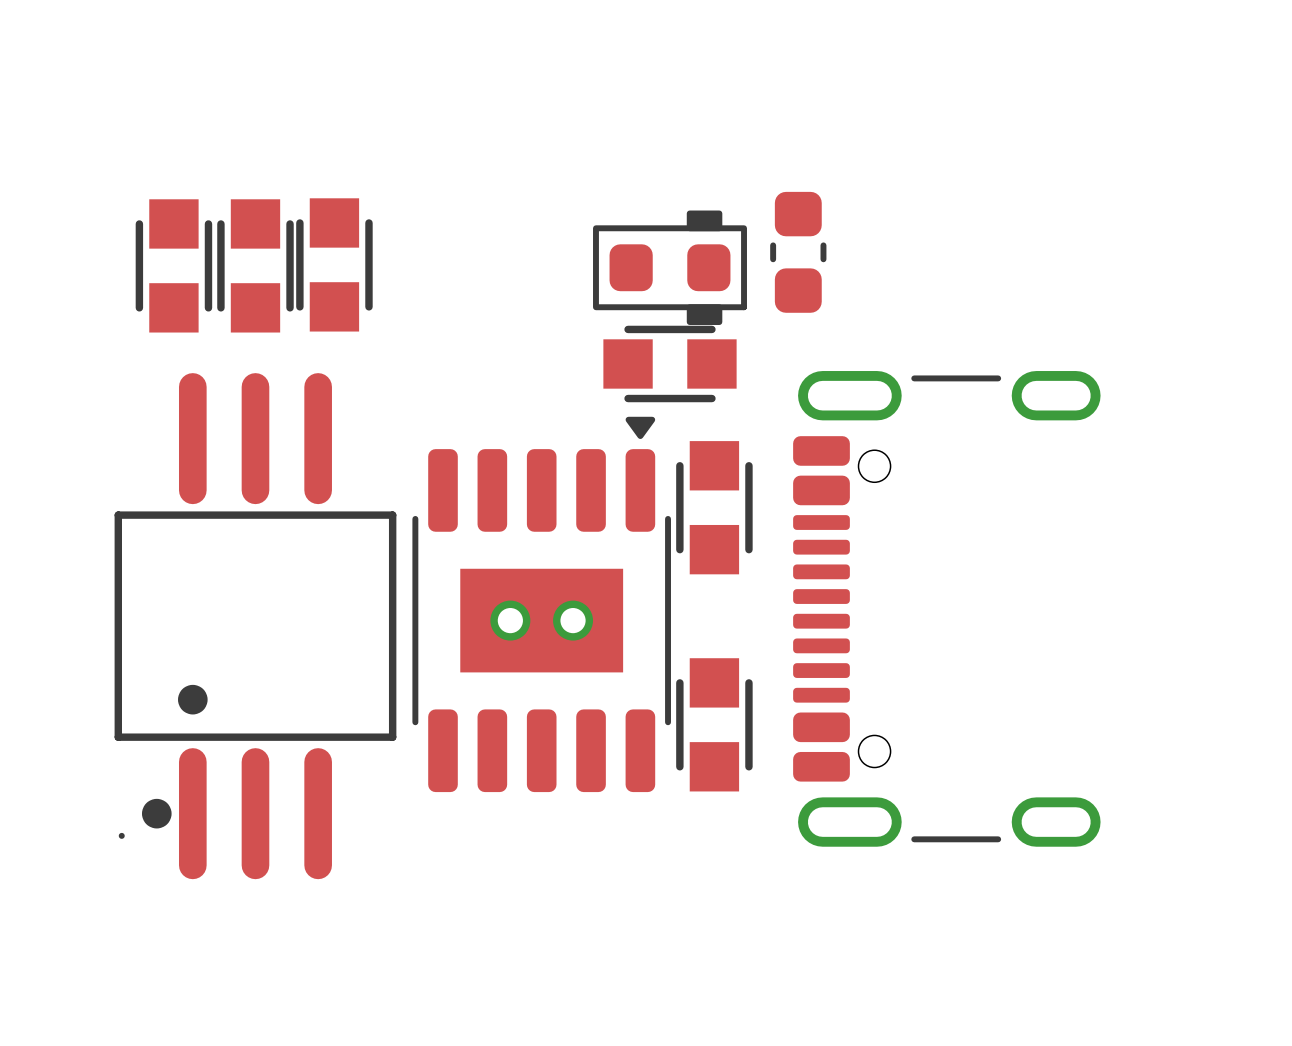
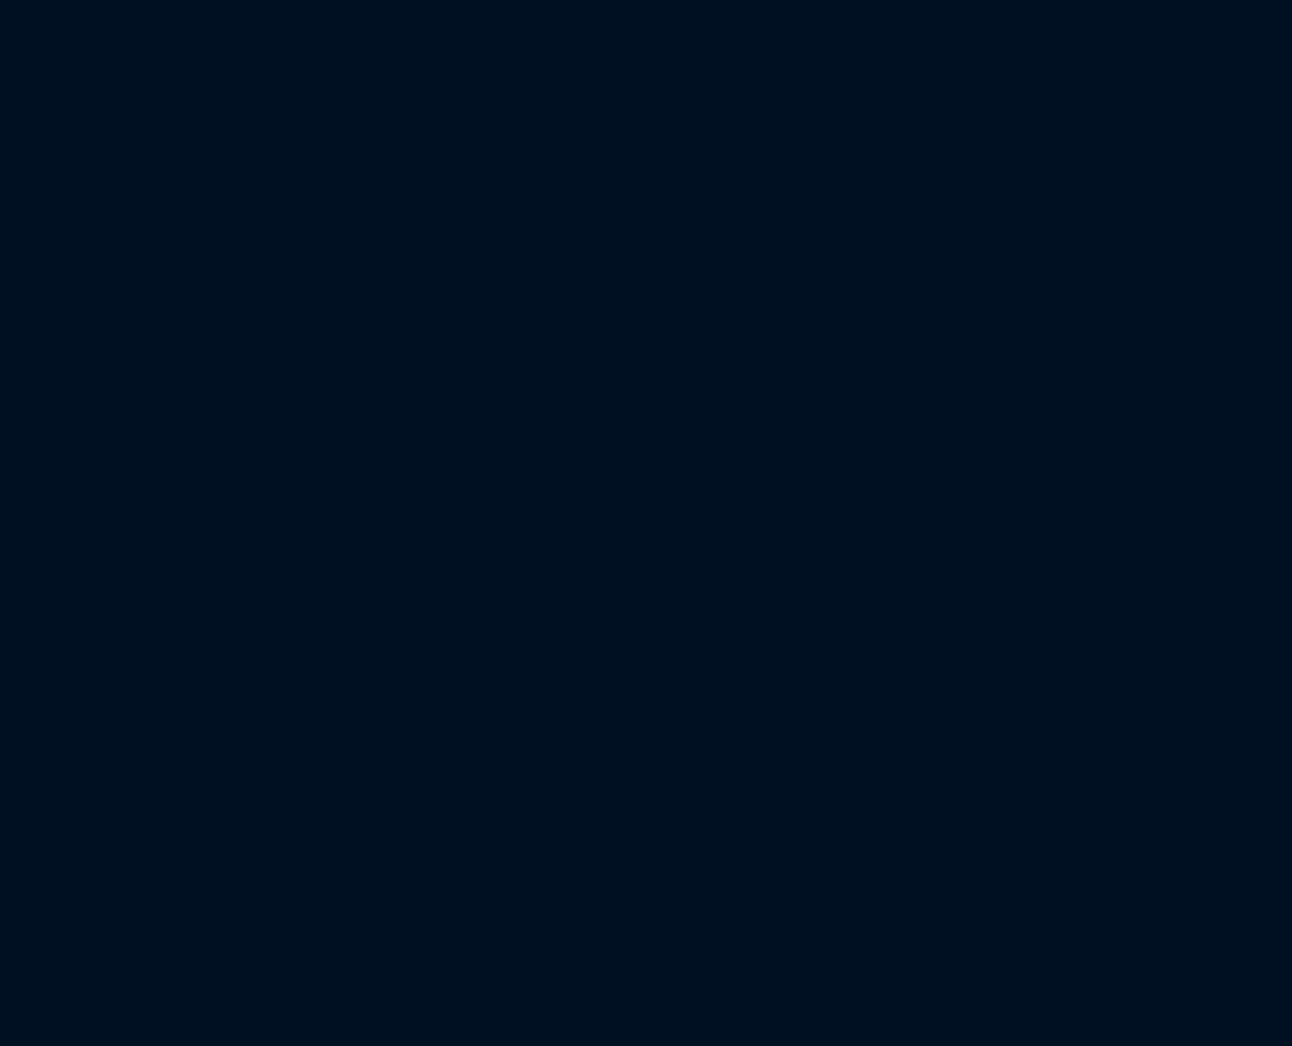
part: (798, 252) -> none
part: (334, 264) -> none
part: (173, 265) -> none
part: (255, 265) -> none
part: (670, 267) -> none
part: (670, 363) -> none
part: (714, 507) -> none
part: (541, 604) -> none
part: (946, 608) -> none
part: (255, 626) -> none
part: (714, 724) -> none

